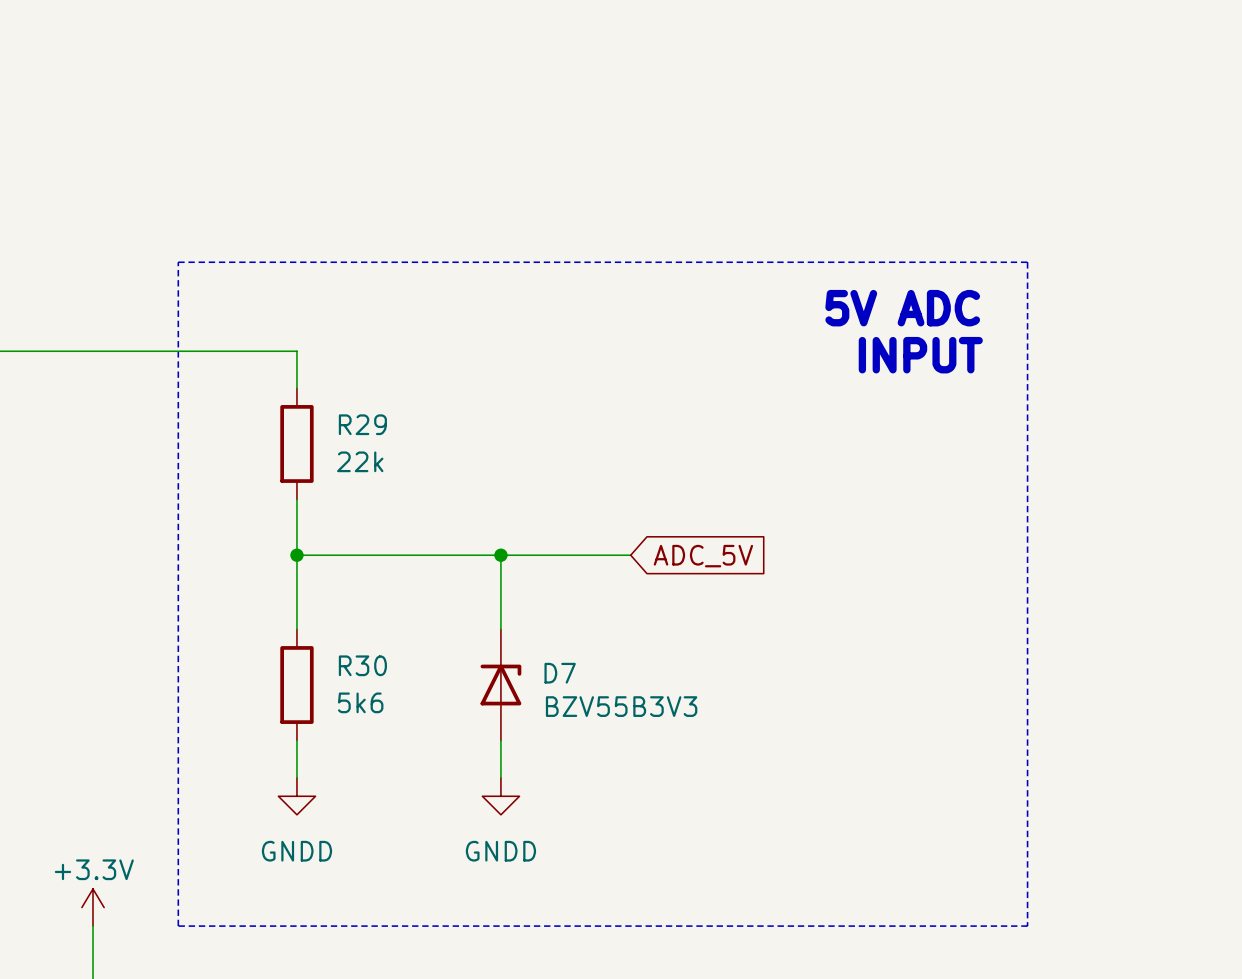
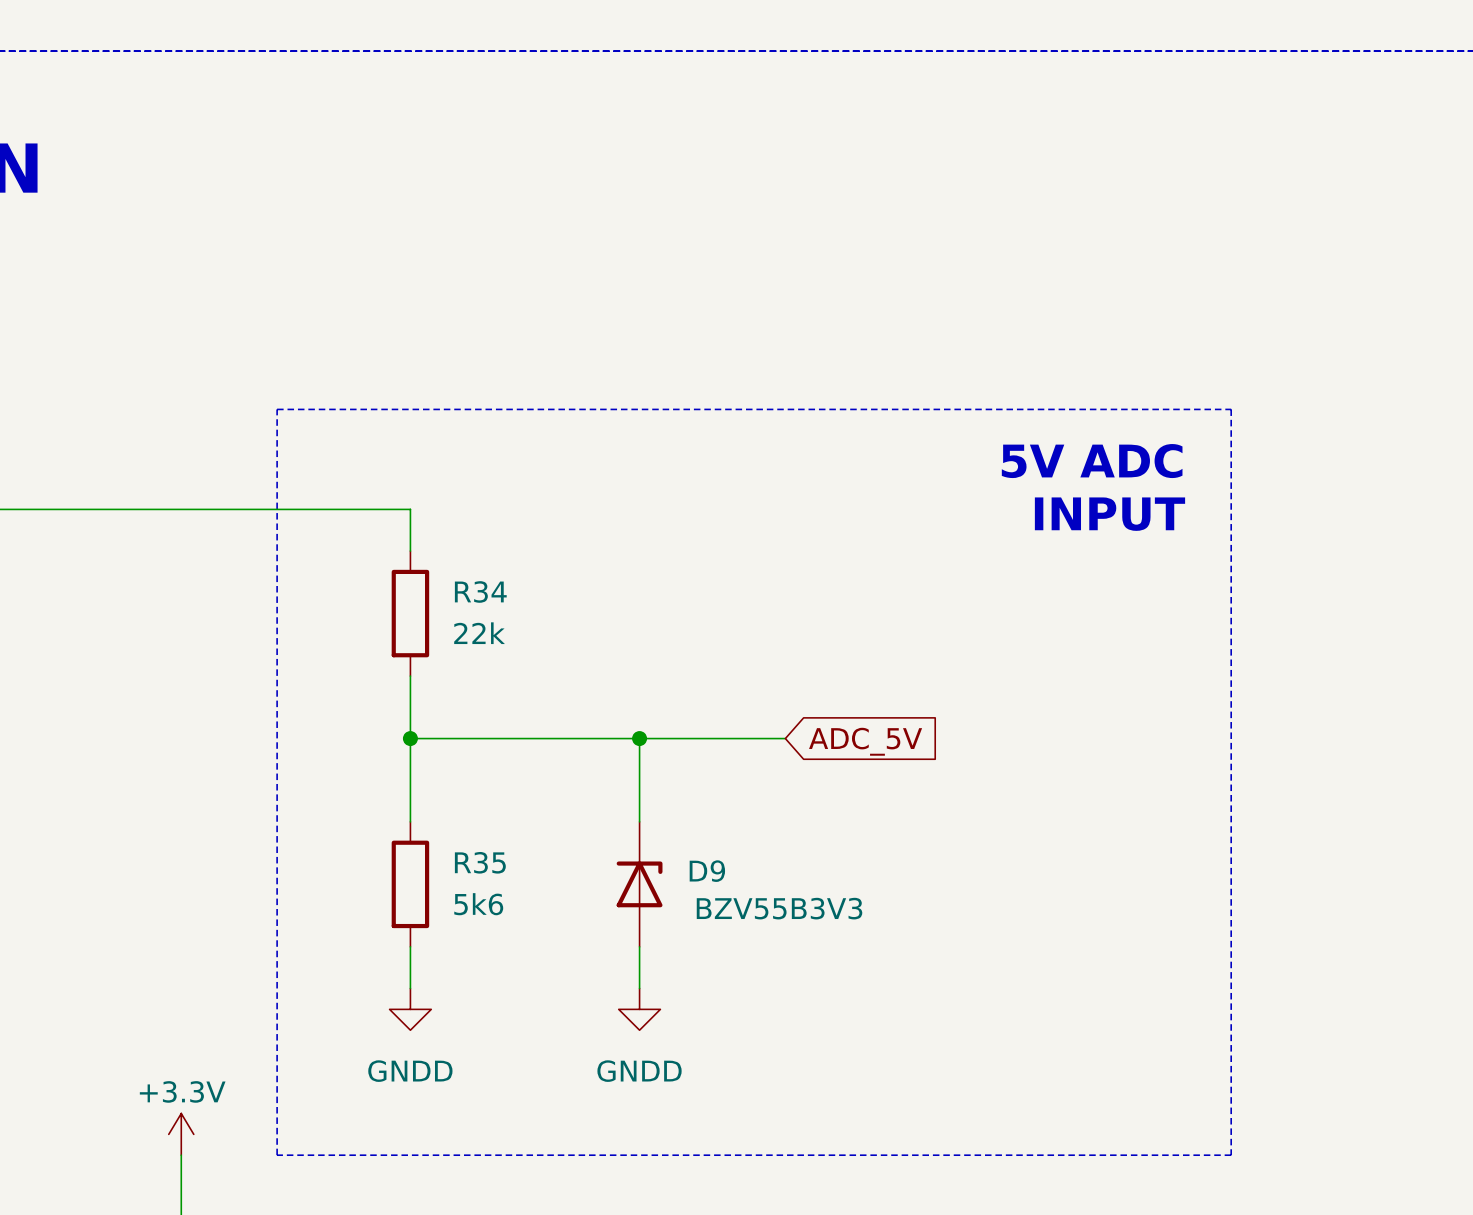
R29 name: R29 (362, 424) -> R34 (480, 591)
R30 name: R30 (362, 665) -> R35 (480, 862)
D7 name: D7 (560, 673) -> D9 (707, 871)

